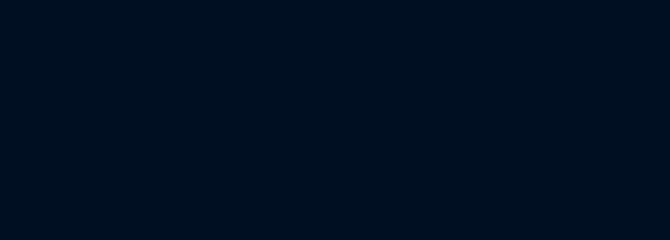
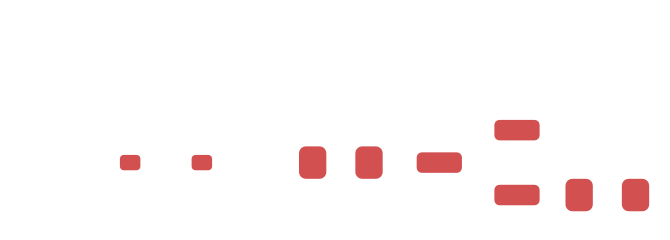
part: none -> (166, 162)
part: none -> (340, 162)
part: none -> (478, 162)
part: none -> (607, 195)

